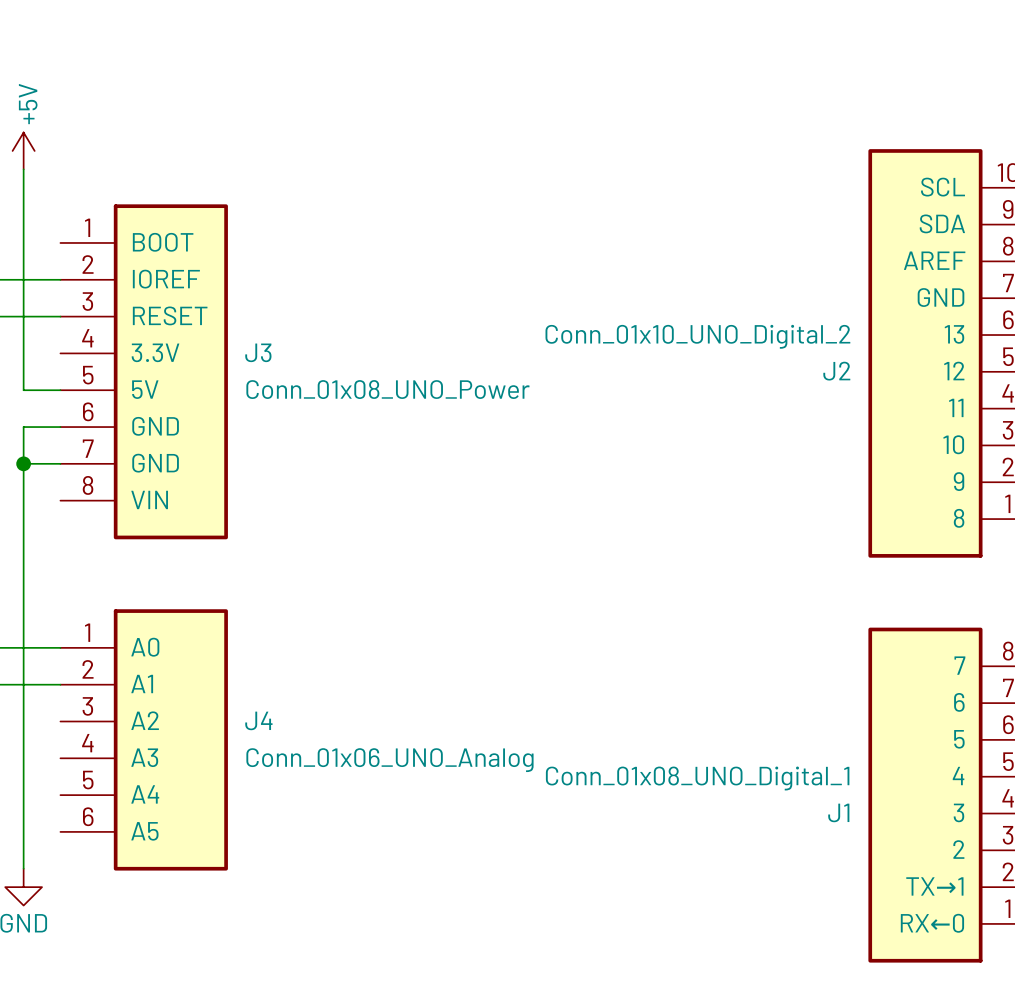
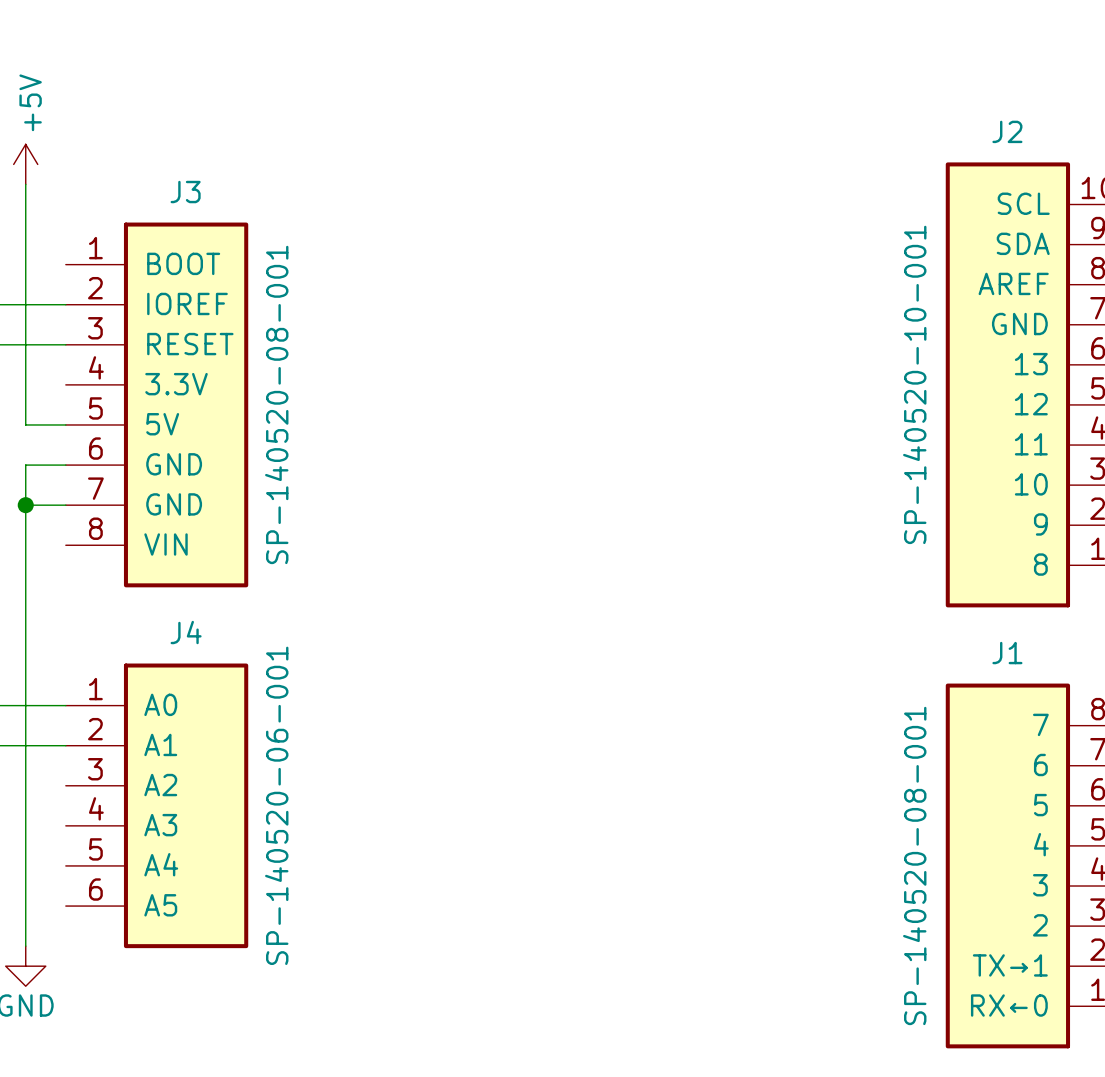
J2 value: Conn_01x10_UNO_Digital_2 (697, 336) -> SP-140520-10-001 (914, 384)
J3 name position: J3 (258, 352) -> J3 (185, 192)
J2 name position: J2 (836, 371) -> J2 (1007, 131)
J3 value: Conn_01x08_UNO_Power (388, 389) -> SP-140520-08-001 (276, 404)
J4 name position: J4 (258, 720) -> J4 (186, 632)
J4 value: Conn_01x06_UNO_Analog (389, 760) -> SP-140520-06-001 (276, 805)
J1 value: Conn_01x08_UNO_Digital_1 (697, 778) -> SP-140520-08-001 (914, 865)
J1 name position: J1 (838, 812) -> J1 (1007, 653)

